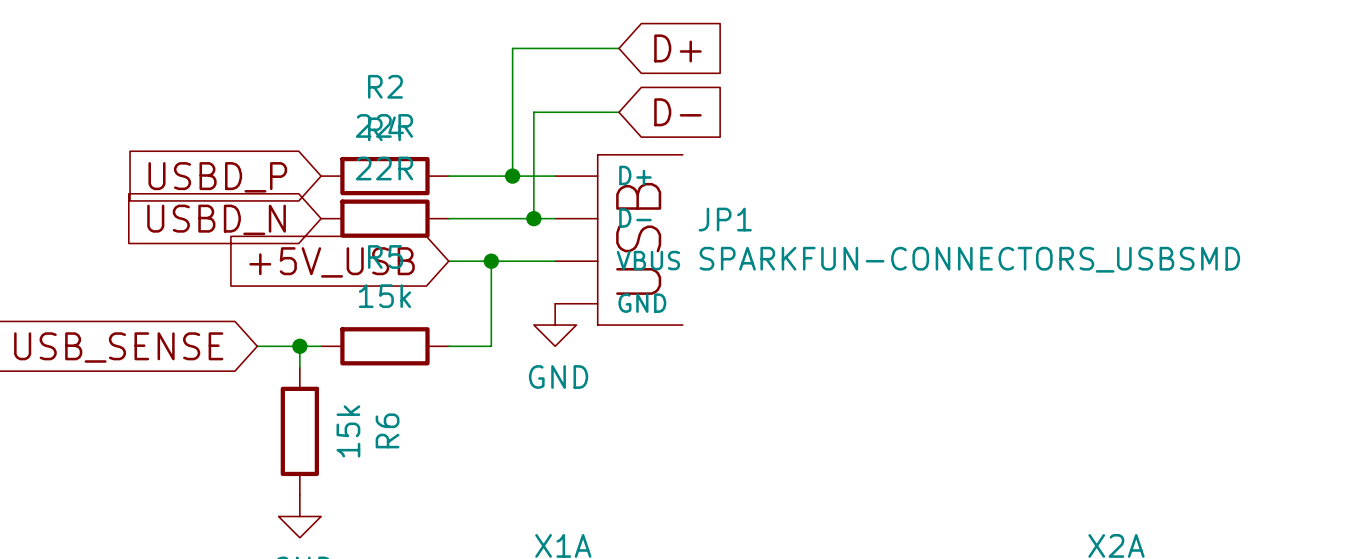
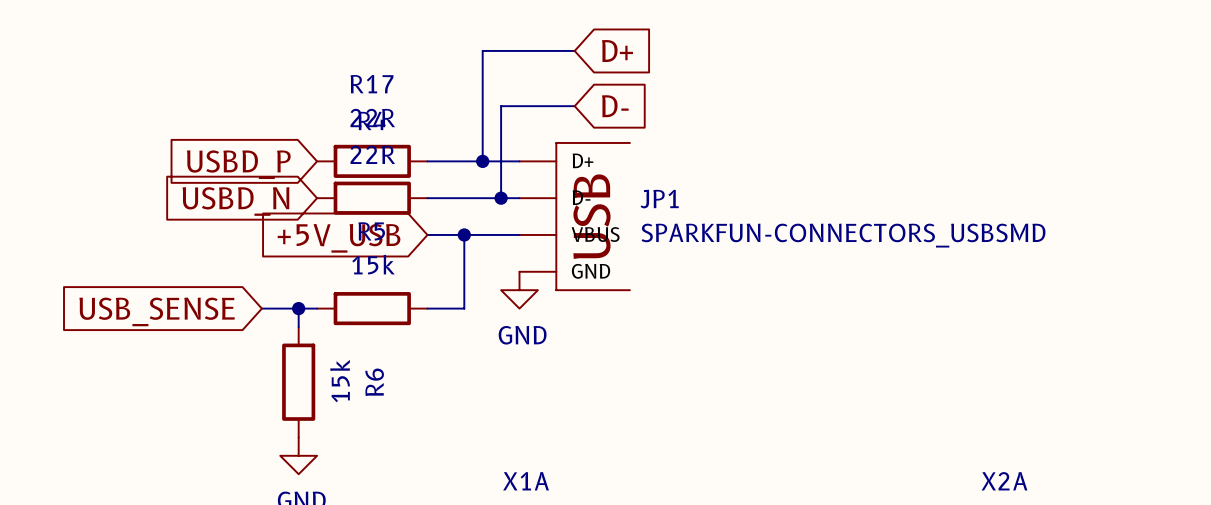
R2 name: R2 (385, 86) -> R17 (372, 84)

